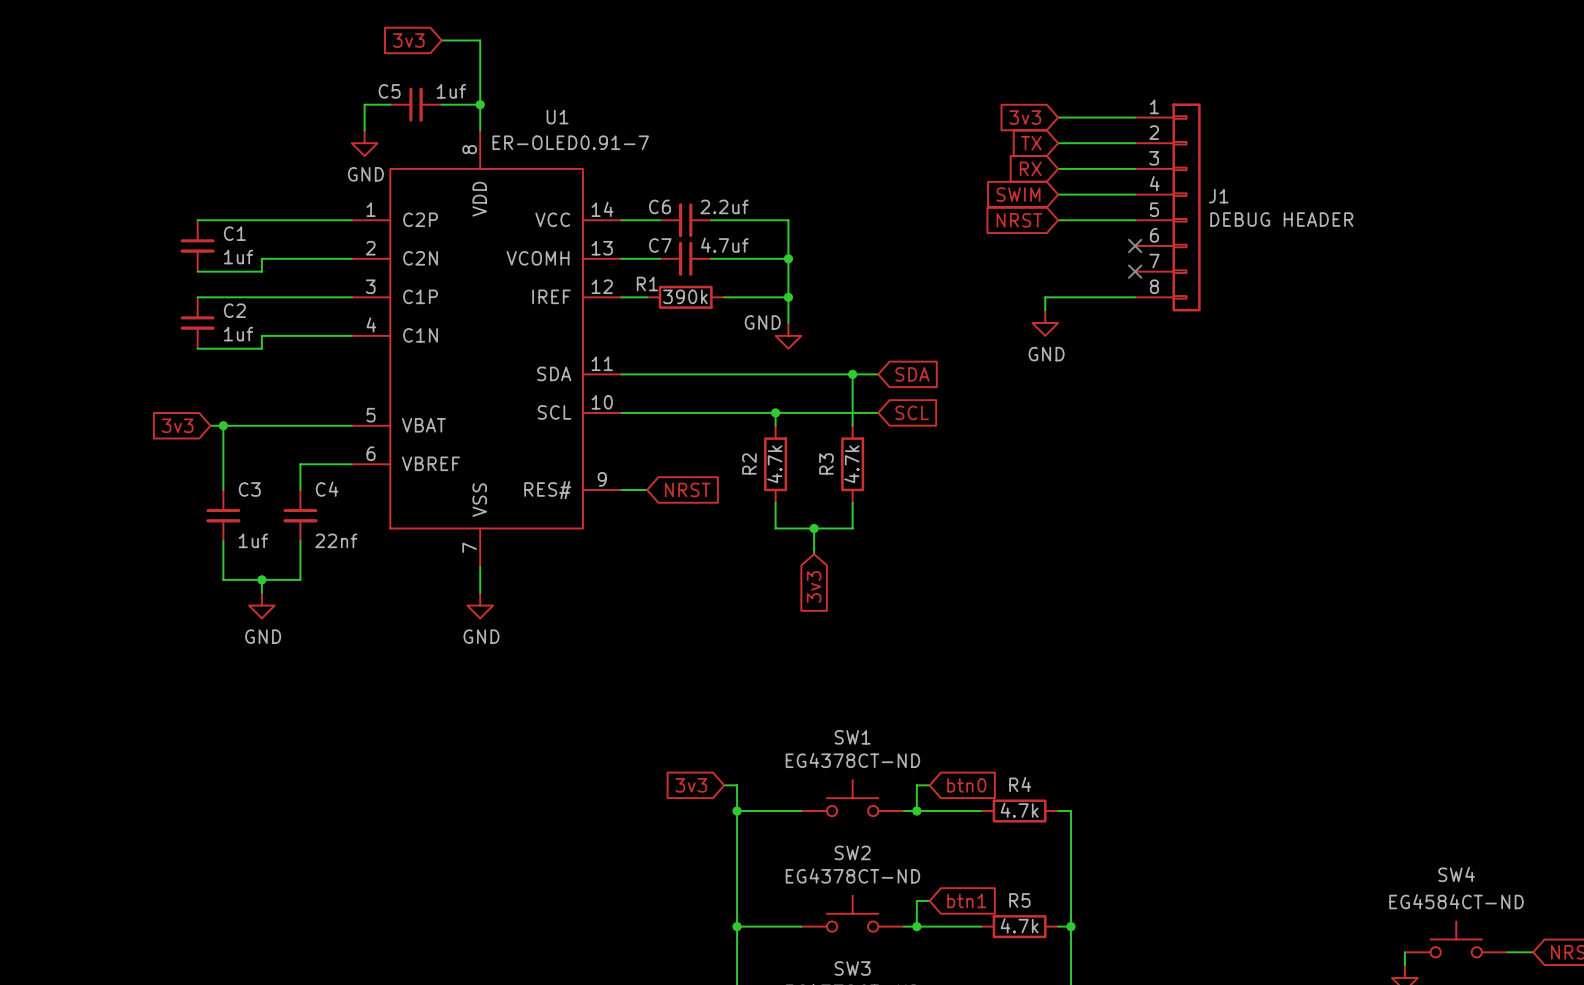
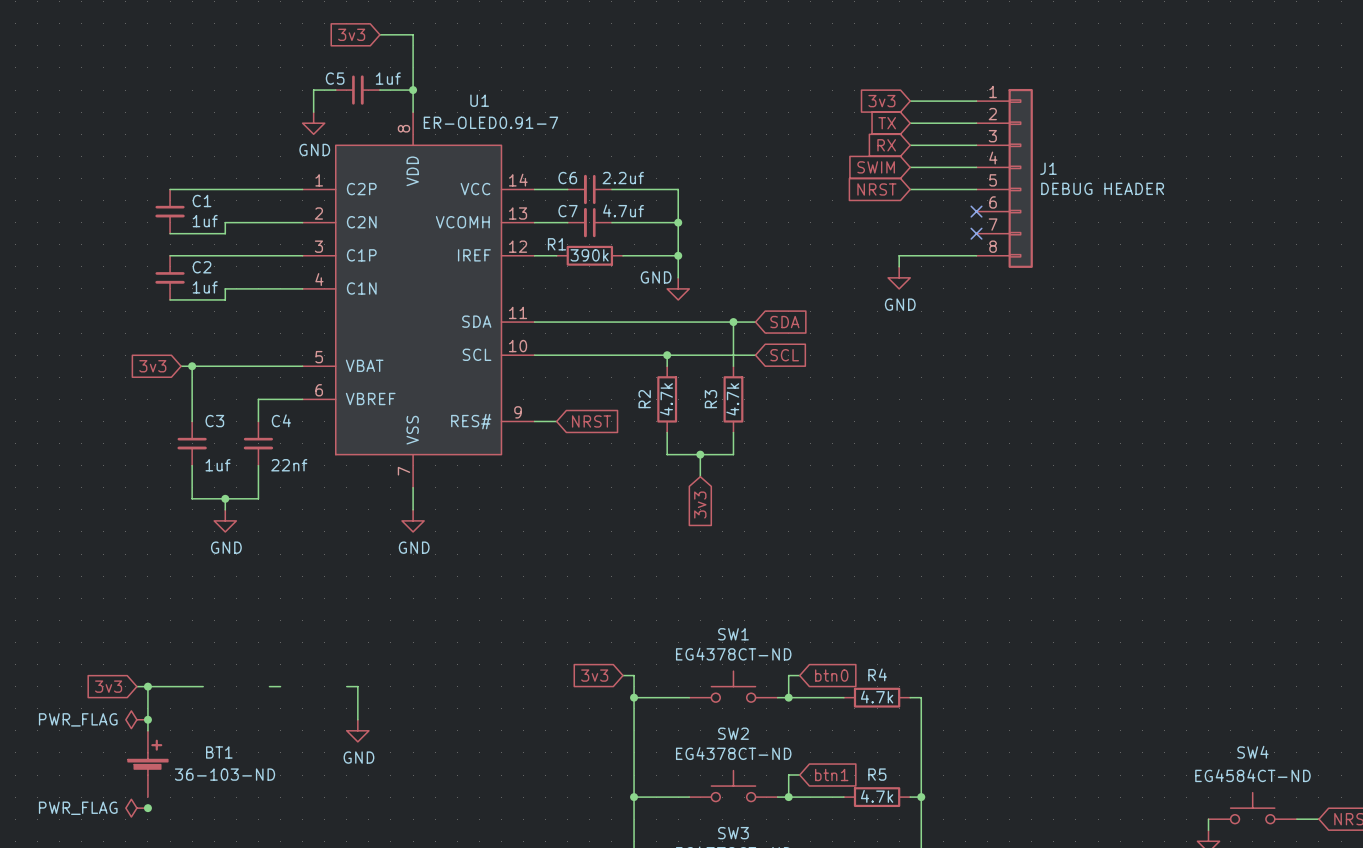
global label: none -> 3v3 (108, 686)
wire: none -> (136, 686) (203, 686)
wire: none -> (147, 686) (147, 730)
junction: none -> (147, 686)
wire: none -> (269, 686) (280, 686)
wire: none -> (346, 686) (357, 686) (357, 719)
power symbol: none -> PWR_FLAG (136, 719)
junction: none -> (147, 719)
power symbol: none -> GND (357, 730)
BT1: none -> (147, 763)
power symbol: none -> PWR_FLAG (136, 808)
junction: none -> (147, 808)

